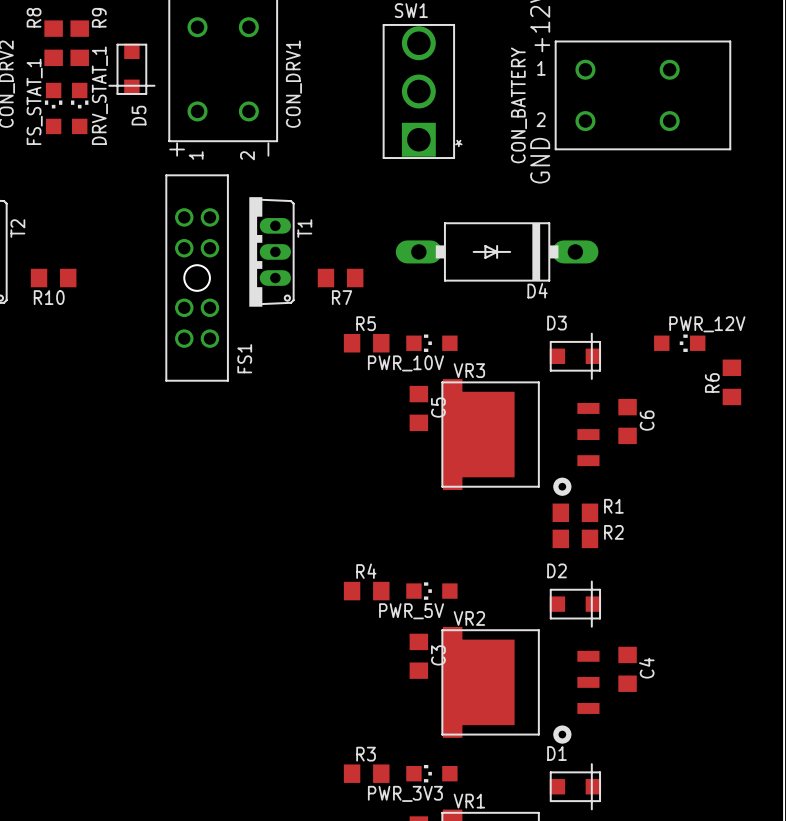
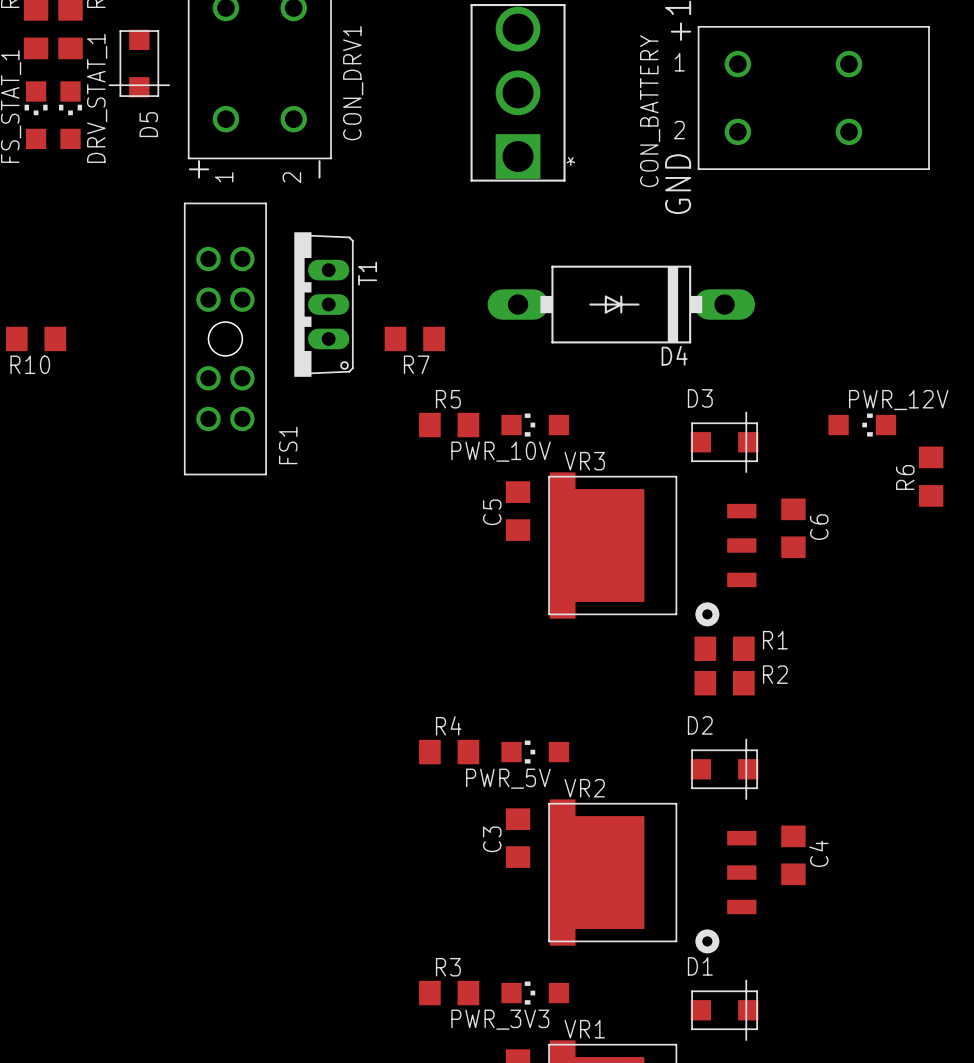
C5 name position: C5 (438, 407) -> C5 (492, 512)
C3 name position: C3 (438, 655) -> C3 (492, 839)

